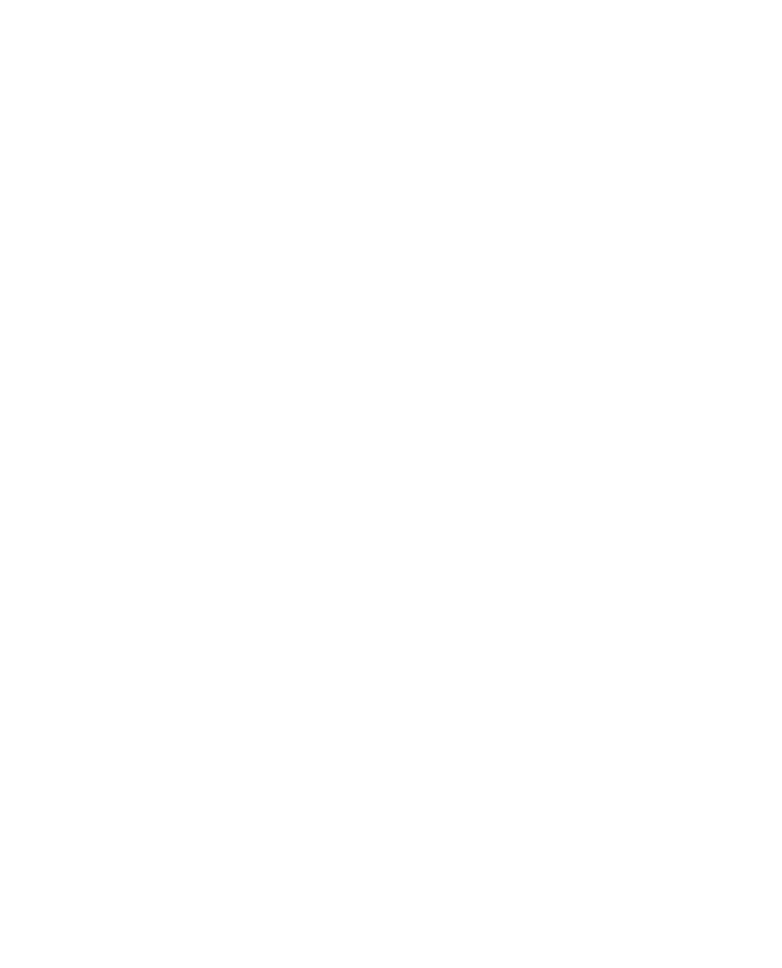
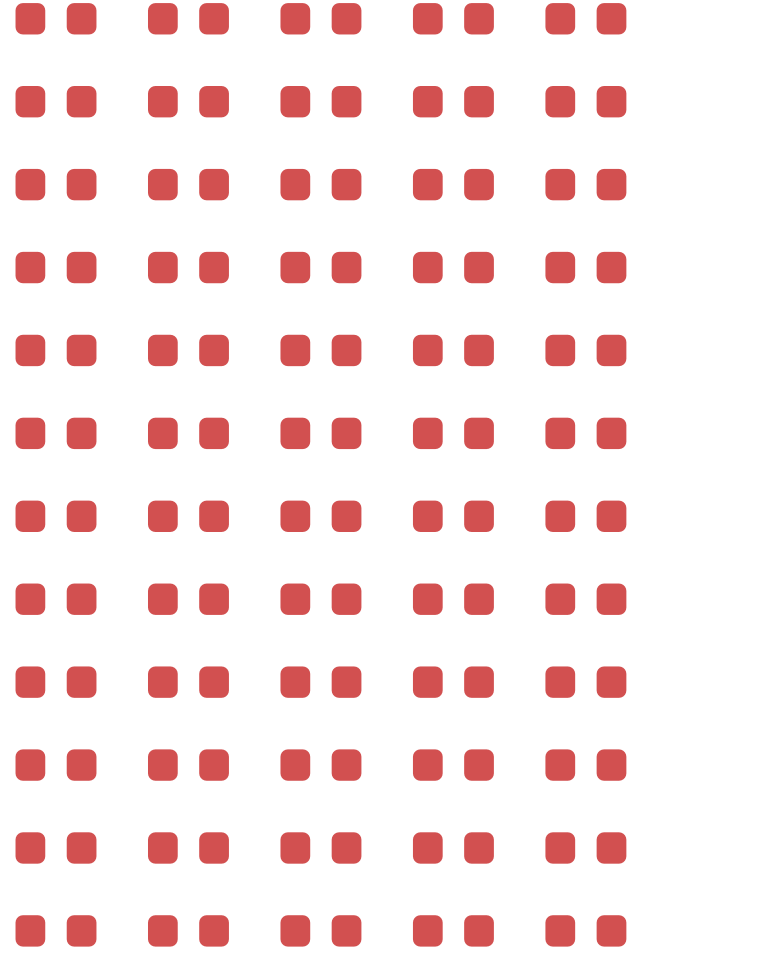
part: none -> (55, 18)
part: none -> (188, 18)
part: none -> (320, 18)
part: none -> (453, 18)
part: none -> (585, 18)
part: none -> (55, 101)
part: none -> (188, 101)
part: none -> (320, 101)
part: none -> (453, 101)
part: none -> (585, 101)
part: none -> (55, 184)
part: none -> (188, 184)
part: none -> (320, 184)
part: none -> (453, 184)
part: none -> (585, 184)
part: none -> (55, 267)
part: none -> (188, 267)
part: none -> (320, 267)
part: none -> (453, 267)
part: none -> (585, 267)
part: none -> (55, 350)
part: none -> (188, 350)
part: none -> (320, 350)
part: none -> (453, 350)
part: none -> (585, 350)
part: none -> (55, 433)
part: none -> (188, 433)
part: none -> (320, 433)
part: none -> (453, 433)
part: none -> (585, 433)
part: none -> (55, 516)
part: none -> (188, 516)
part: none -> (320, 516)
part: none -> (453, 516)
part: none -> (585, 516)
part: none -> (55, 599)
part: none -> (188, 599)
part: none -> (320, 599)
part: none -> (453, 599)
part: none -> (585, 599)
part: none -> (55, 682)
part: none -> (188, 682)
part: none -> (320, 682)
part: none -> (453, 682)
part: none -> (585, 682)
part: none -> (55, 765)
part: none -> (188, 765)
part: none -> (320, 765)
part: none -> (453, 765)
part: none -> (585, 765)
part: none -> (55, 847)
part: none -> (188, 847)
part: none -> (320, 847)
part: none -> (453, 847)
part: none -> (585, 847)
part: none -> (55, 930)
part: none -> (188, 930)
part: none -> (320, 930)
part: none -> (453, 930)
part: none -> (585, 930)

